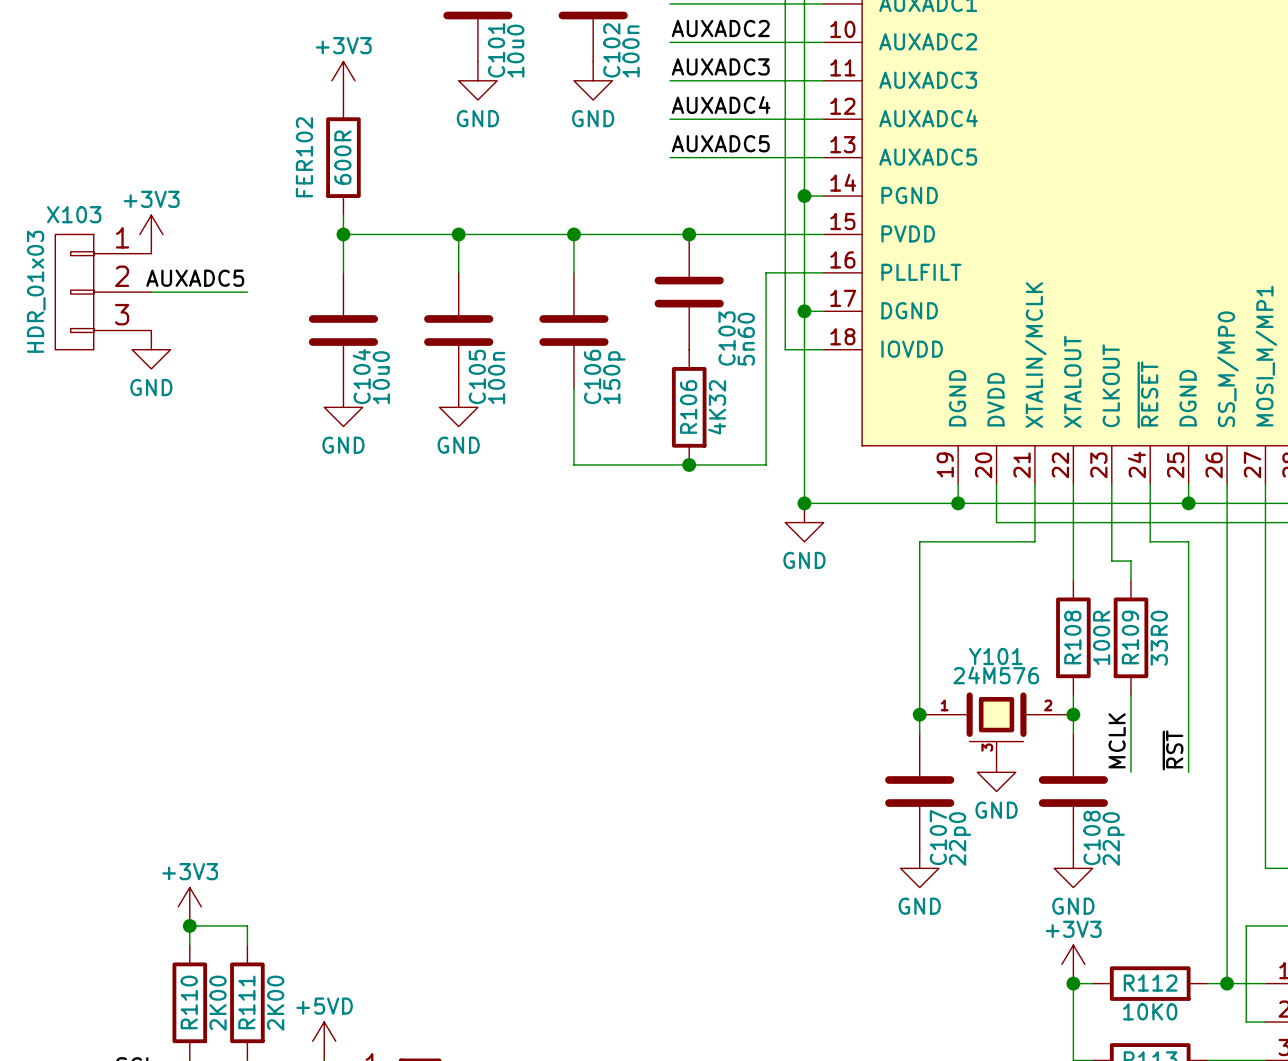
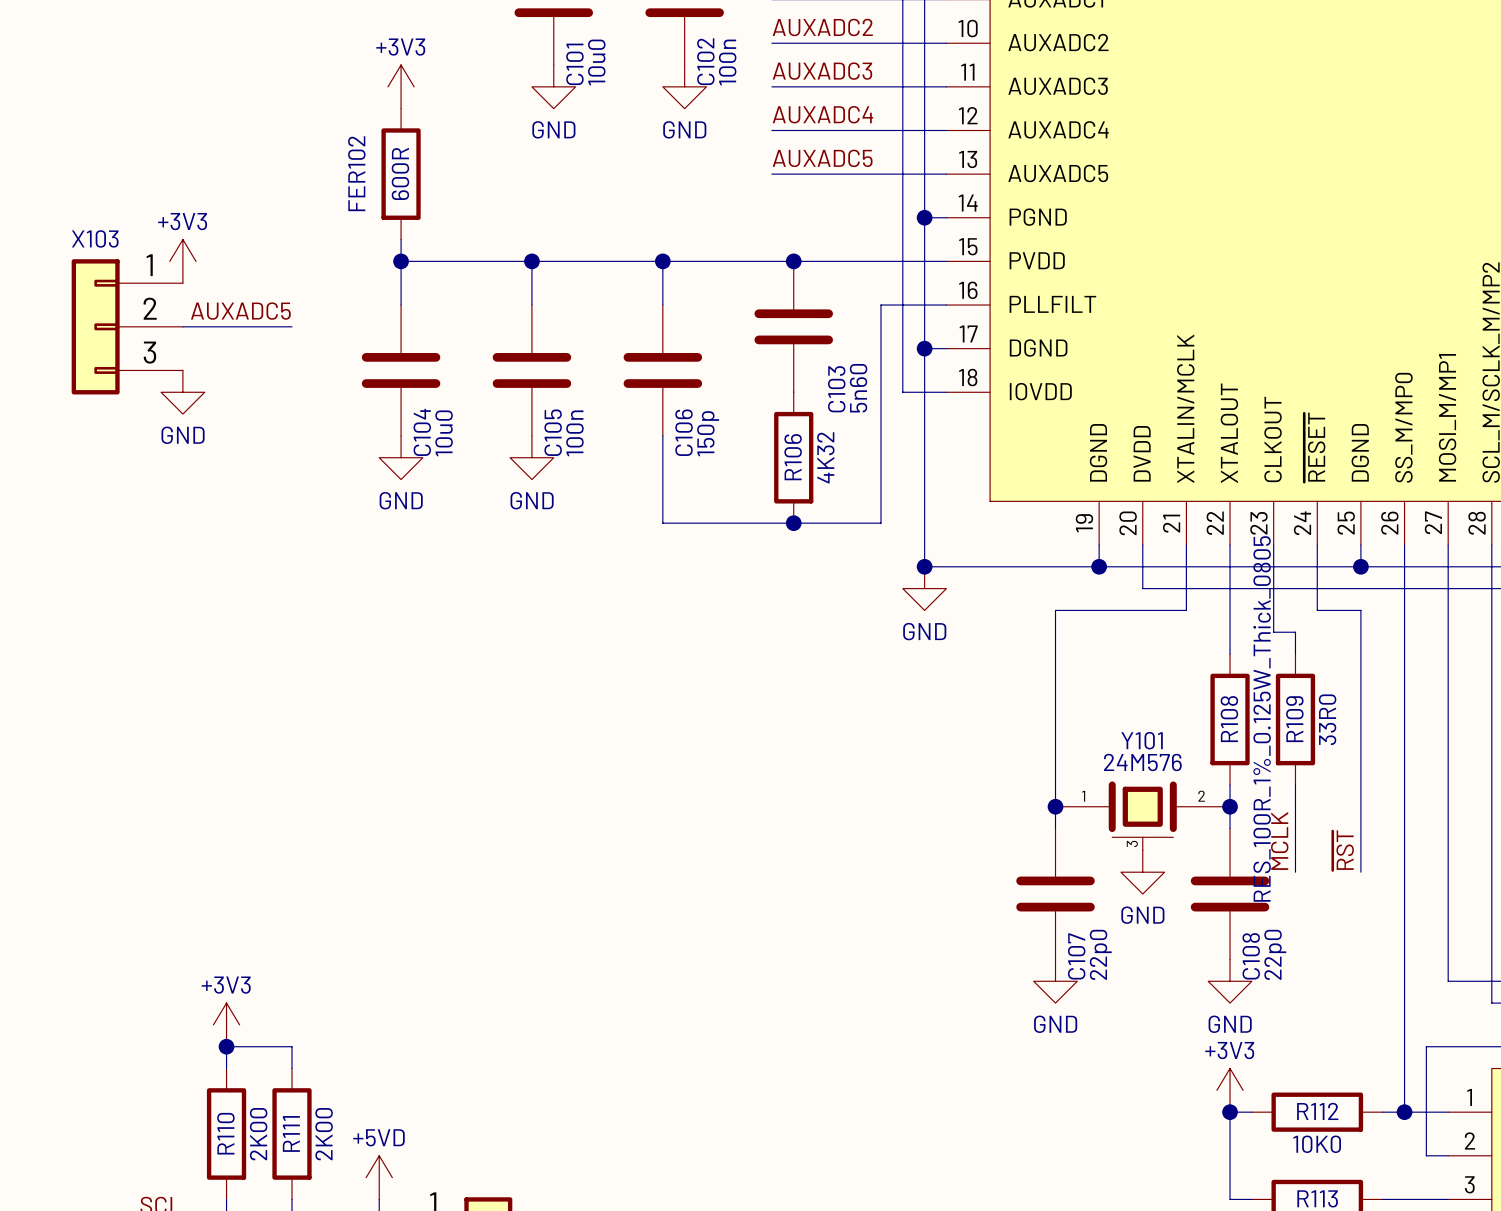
X103 symbol: [55, 234, 152, 350] -> [71, 259, 183, 395]
X103 value: HDR_01x03 (36, 291) -> none
R108 value: 100R (1101, 637) -> RES_100R_1%_0.125W_Thick_0805 (1262, 718)

